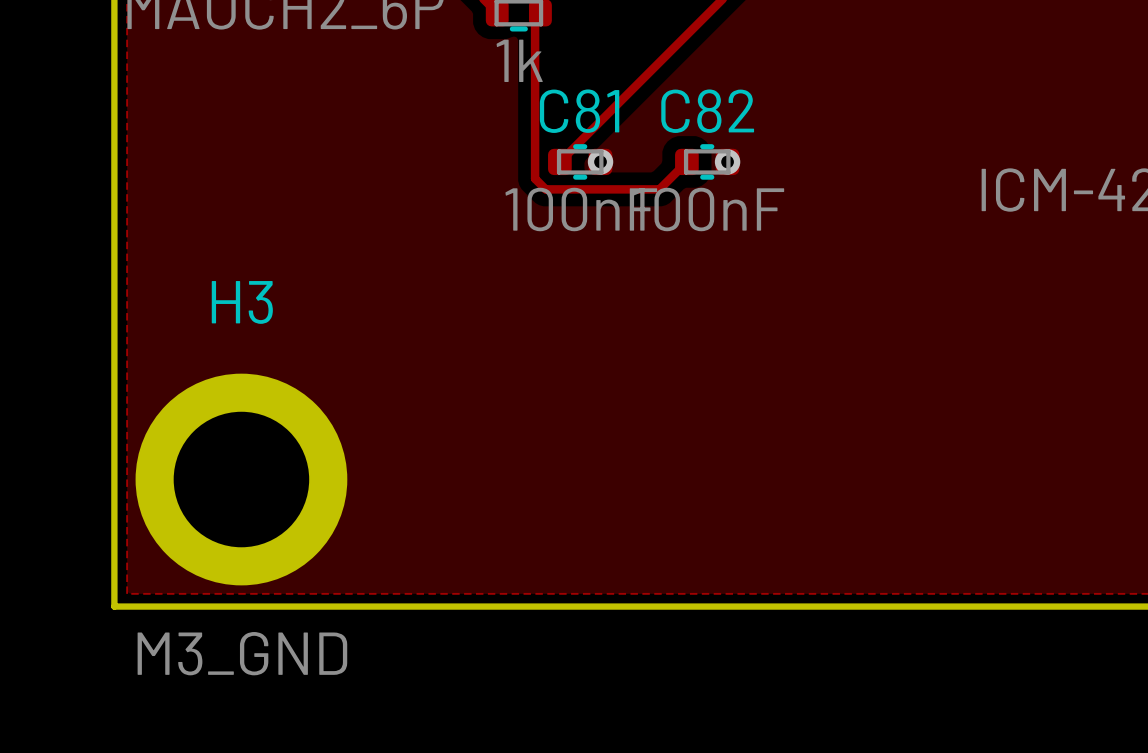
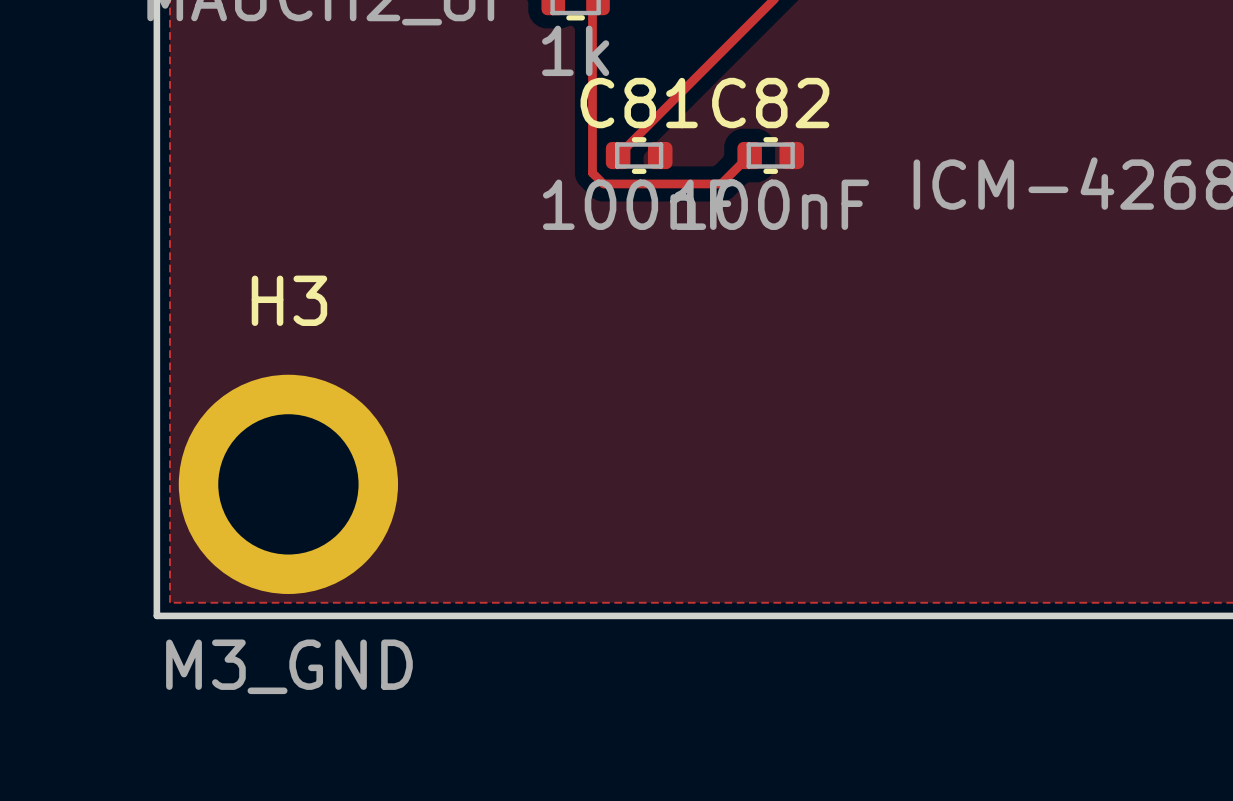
via: (600, 161) -> none
via: (727, 161) -> none

